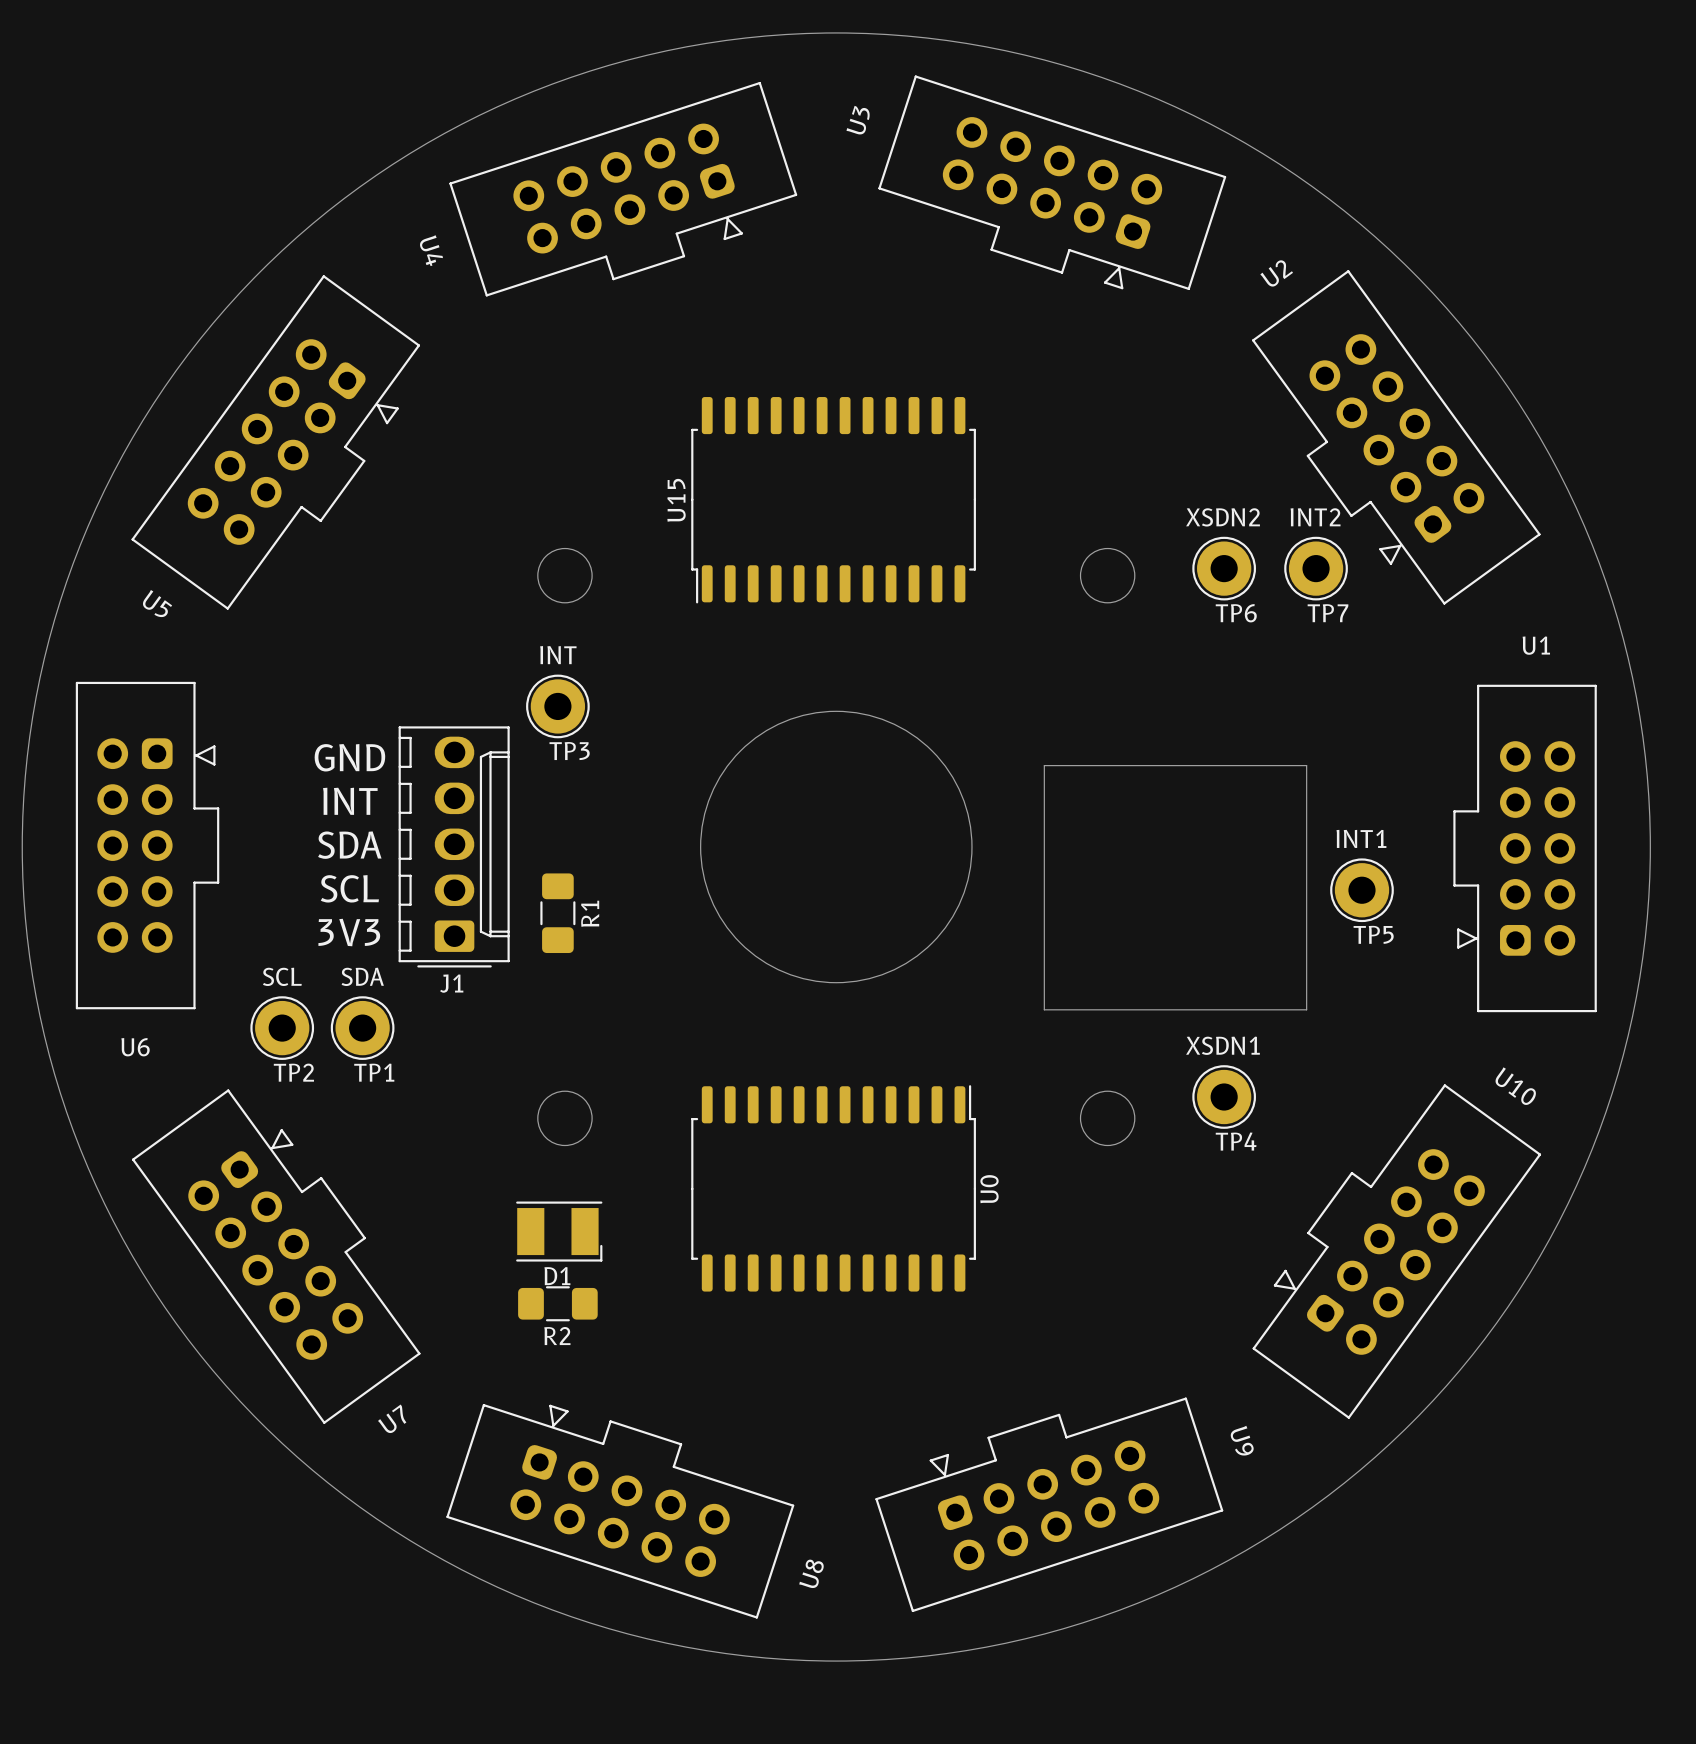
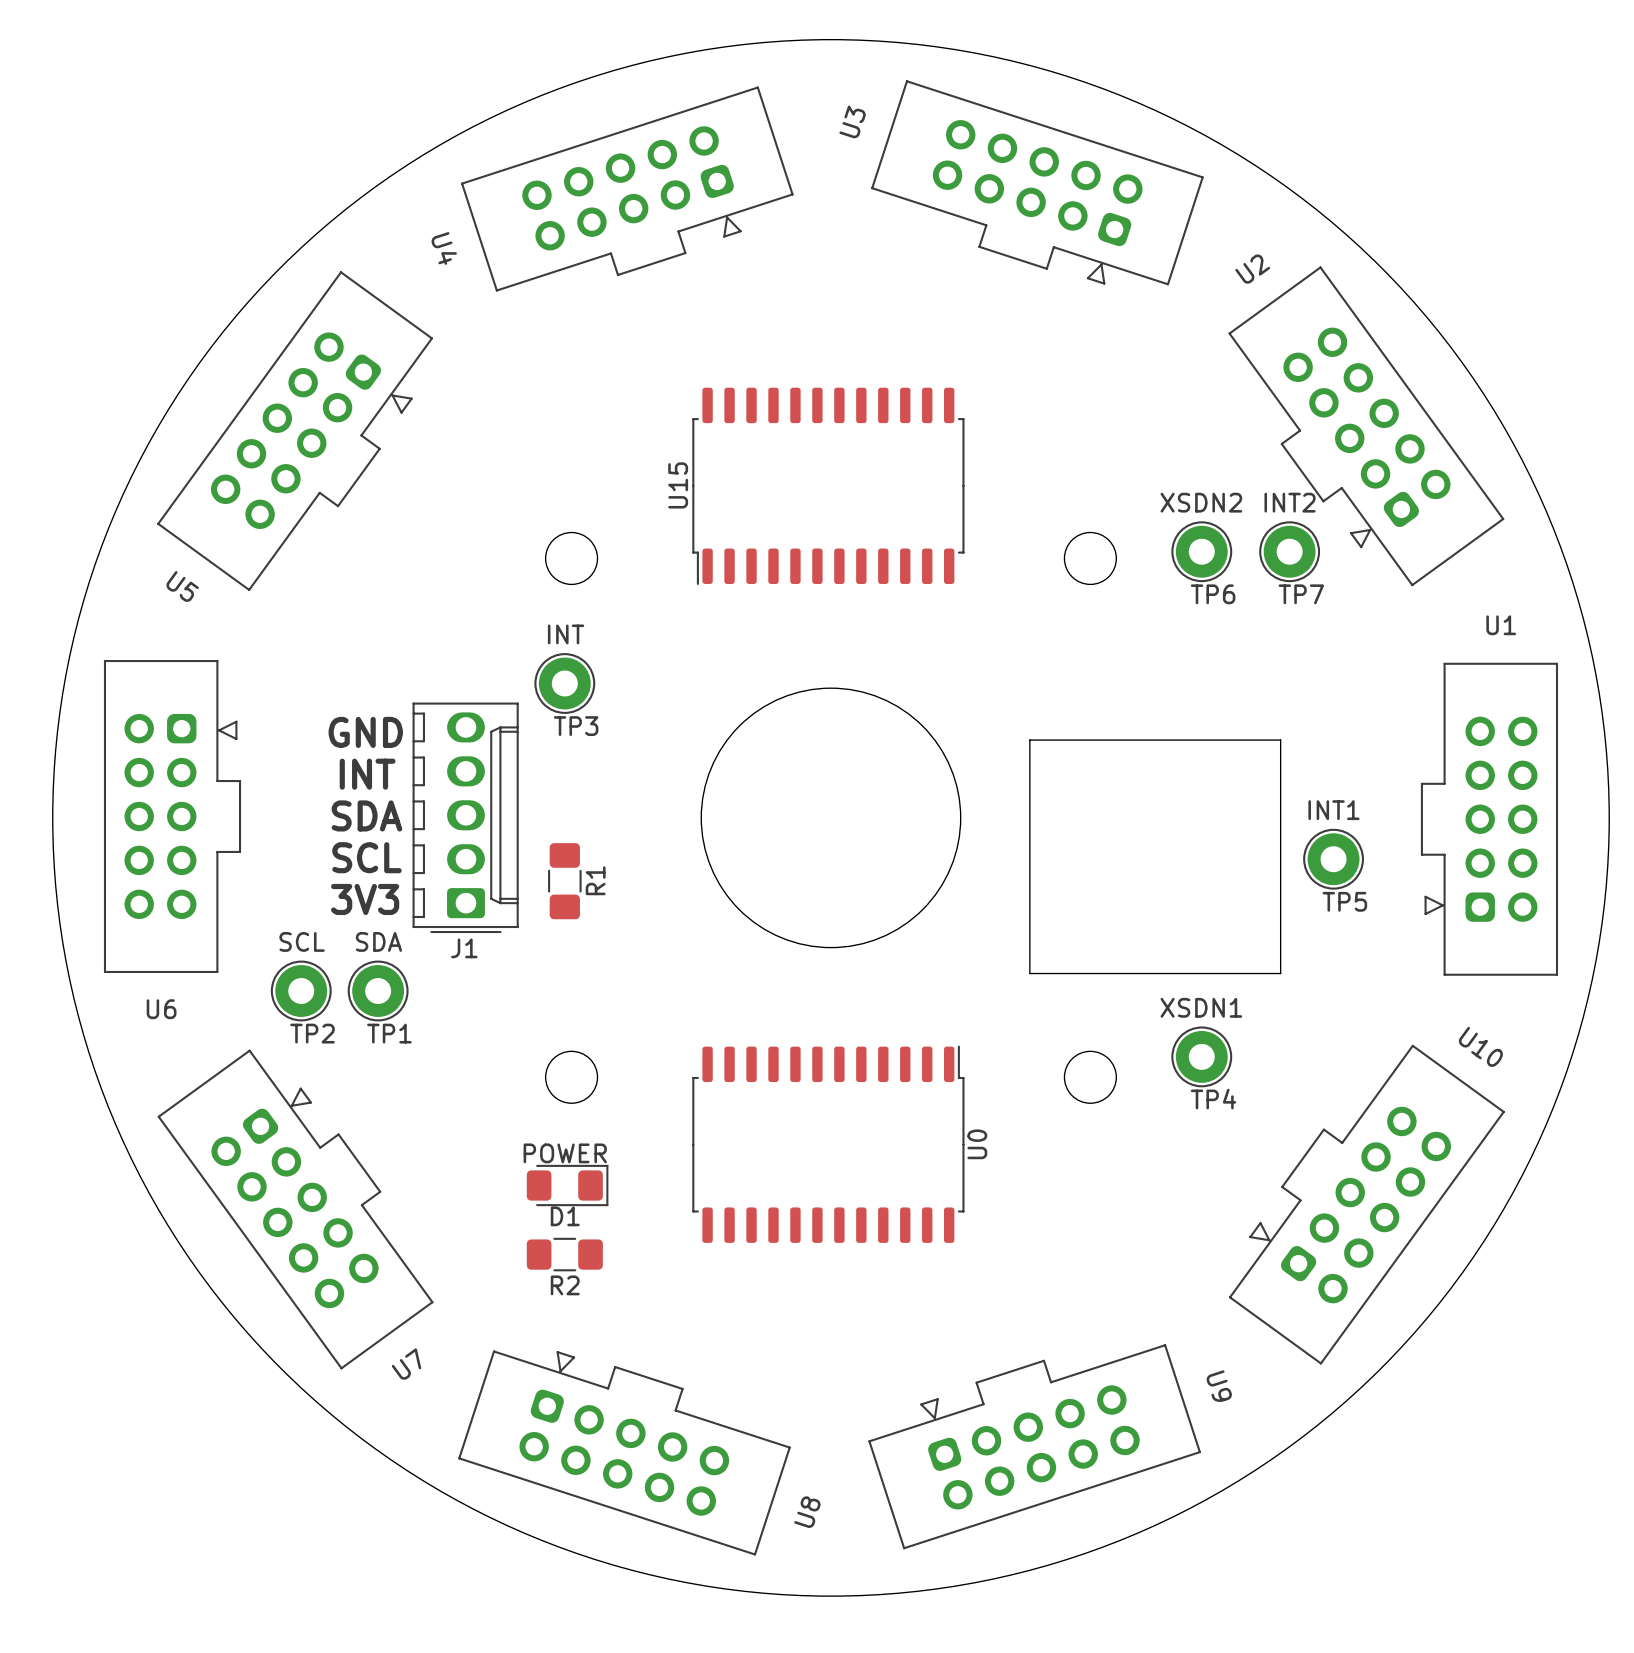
D1 value: none -> POWER (565, 1153)
D1 footprint: [516, 1201, 603, 1262] -> [526, 1164, 609, 1207]

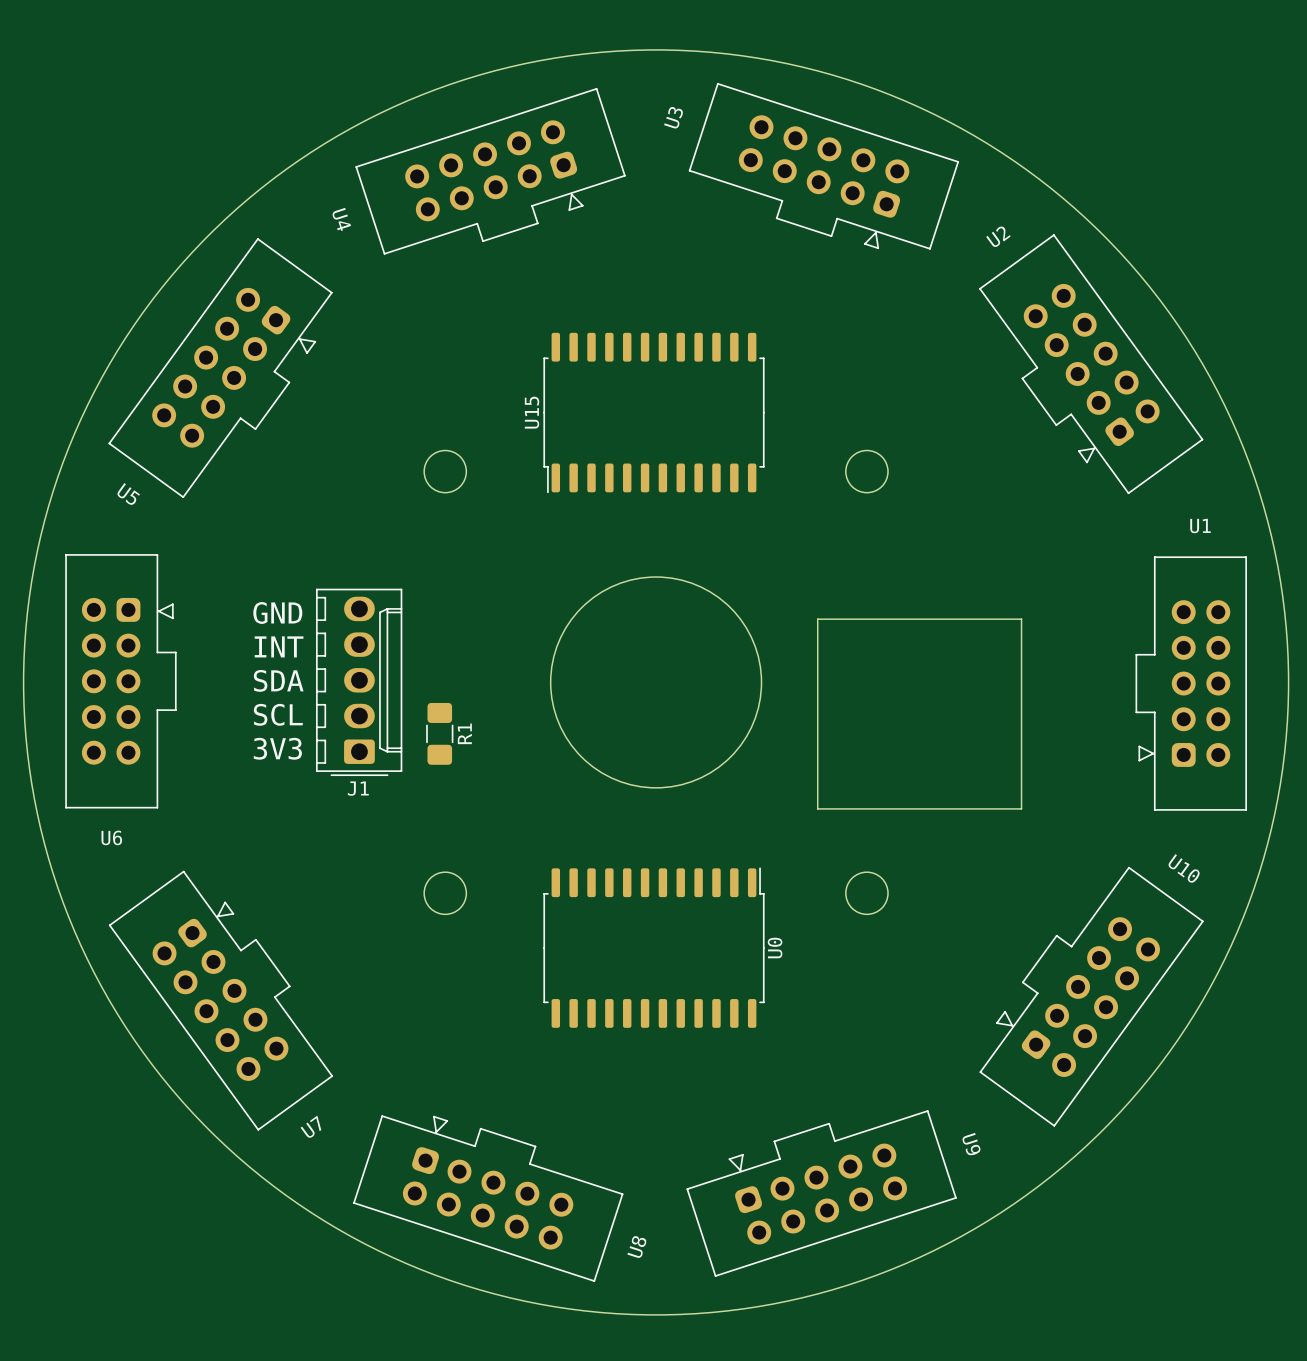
TP6: XSDN2 (1201, 551) -> none
TP7: INT2 (1289, 551) -> none
TP3: INT (564, 683) -> none
TP5: INT1 (1333, 859) -> none
TP2: SCL (301, 991) -> none
TP1: SDA (378, 991) -> none
TP4: XSDN1 (1201, 1056) -> none
D1: POWER (567, 1185) -> none
R2: (564, 1254) -> none

